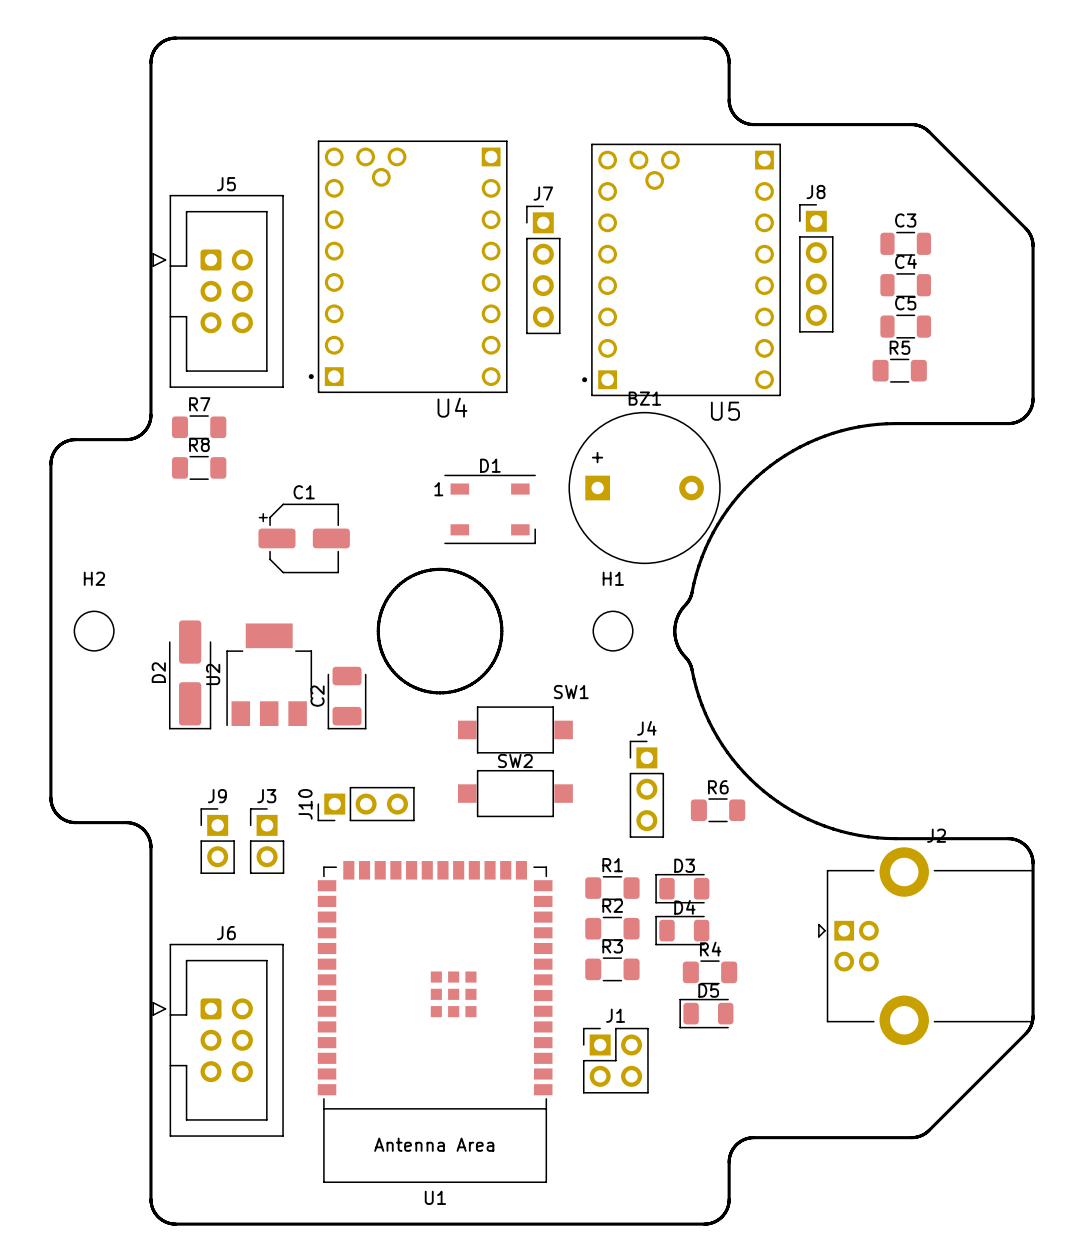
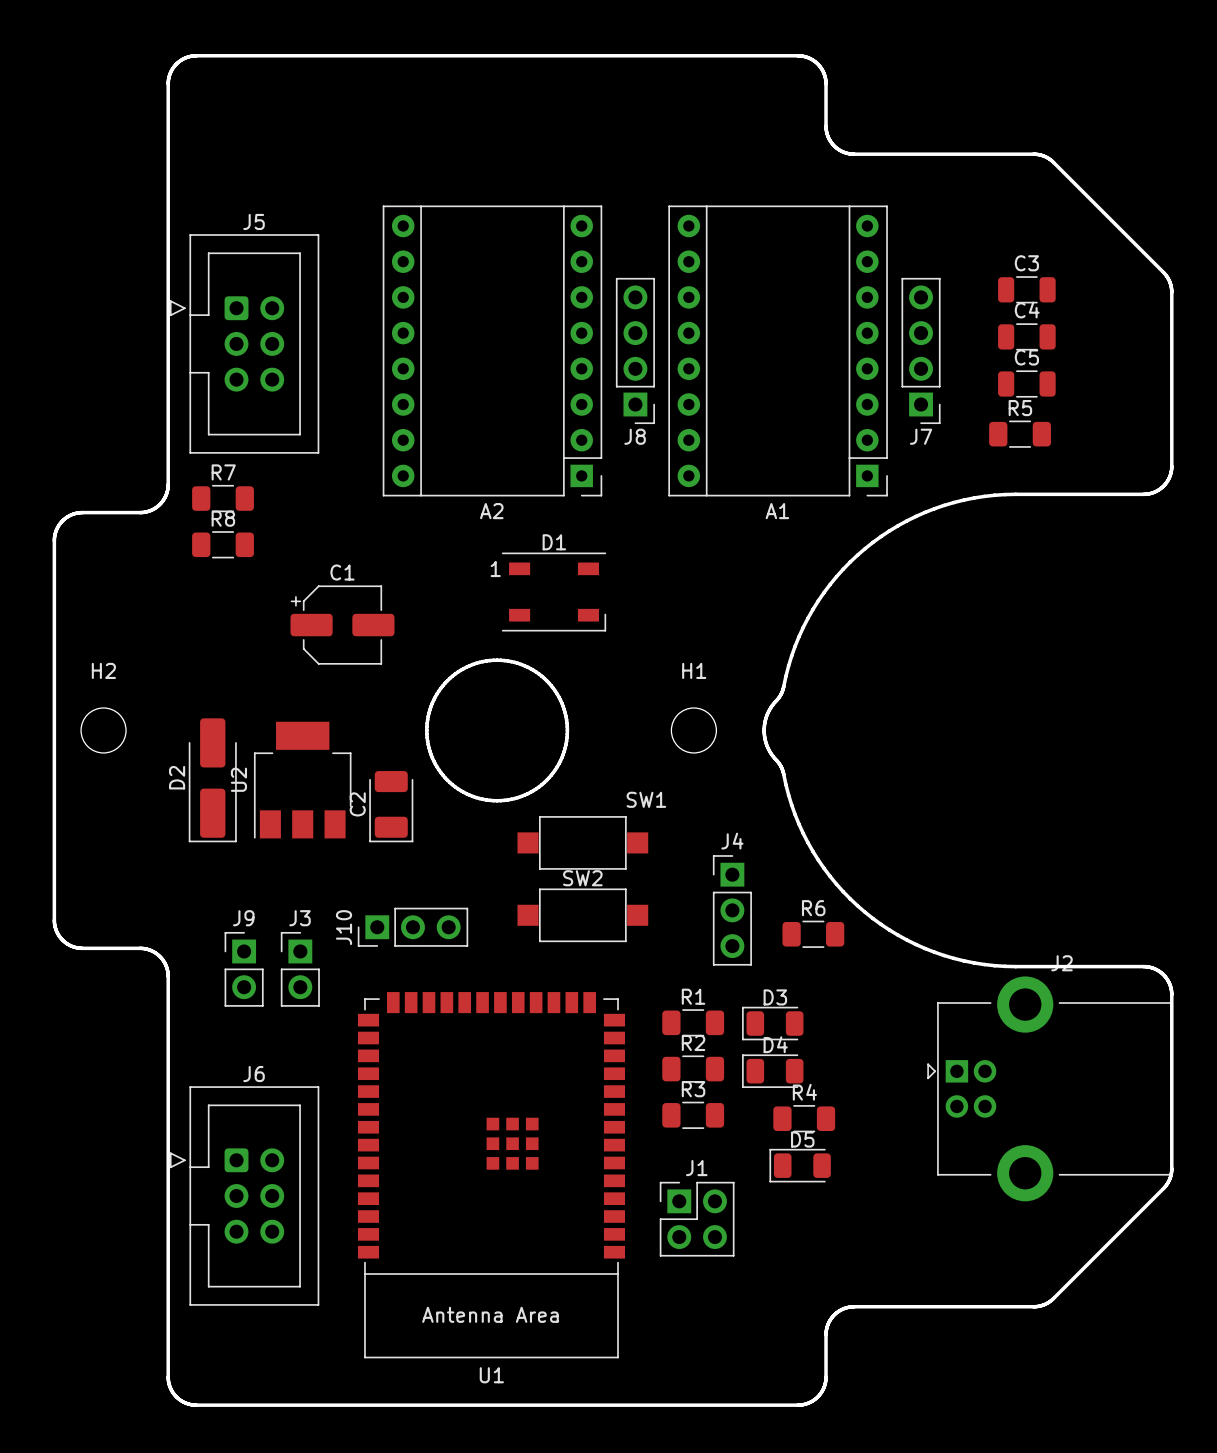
U4: (408, 266) -> none
J8 rotation: 0° (816, 268) -> 180° (635, 350)
J8 position: (816, 268) -> (635, 350)
J7 rotation: 0° (543, 269) -> 180° (921, 350)
J7 position: (543, 269) -> (921, 350)
U5: (681, 269) -> none
A2: none -> (492, 350)
A1: none -> (778, 350)
BZ1: (644, 488) -> none

